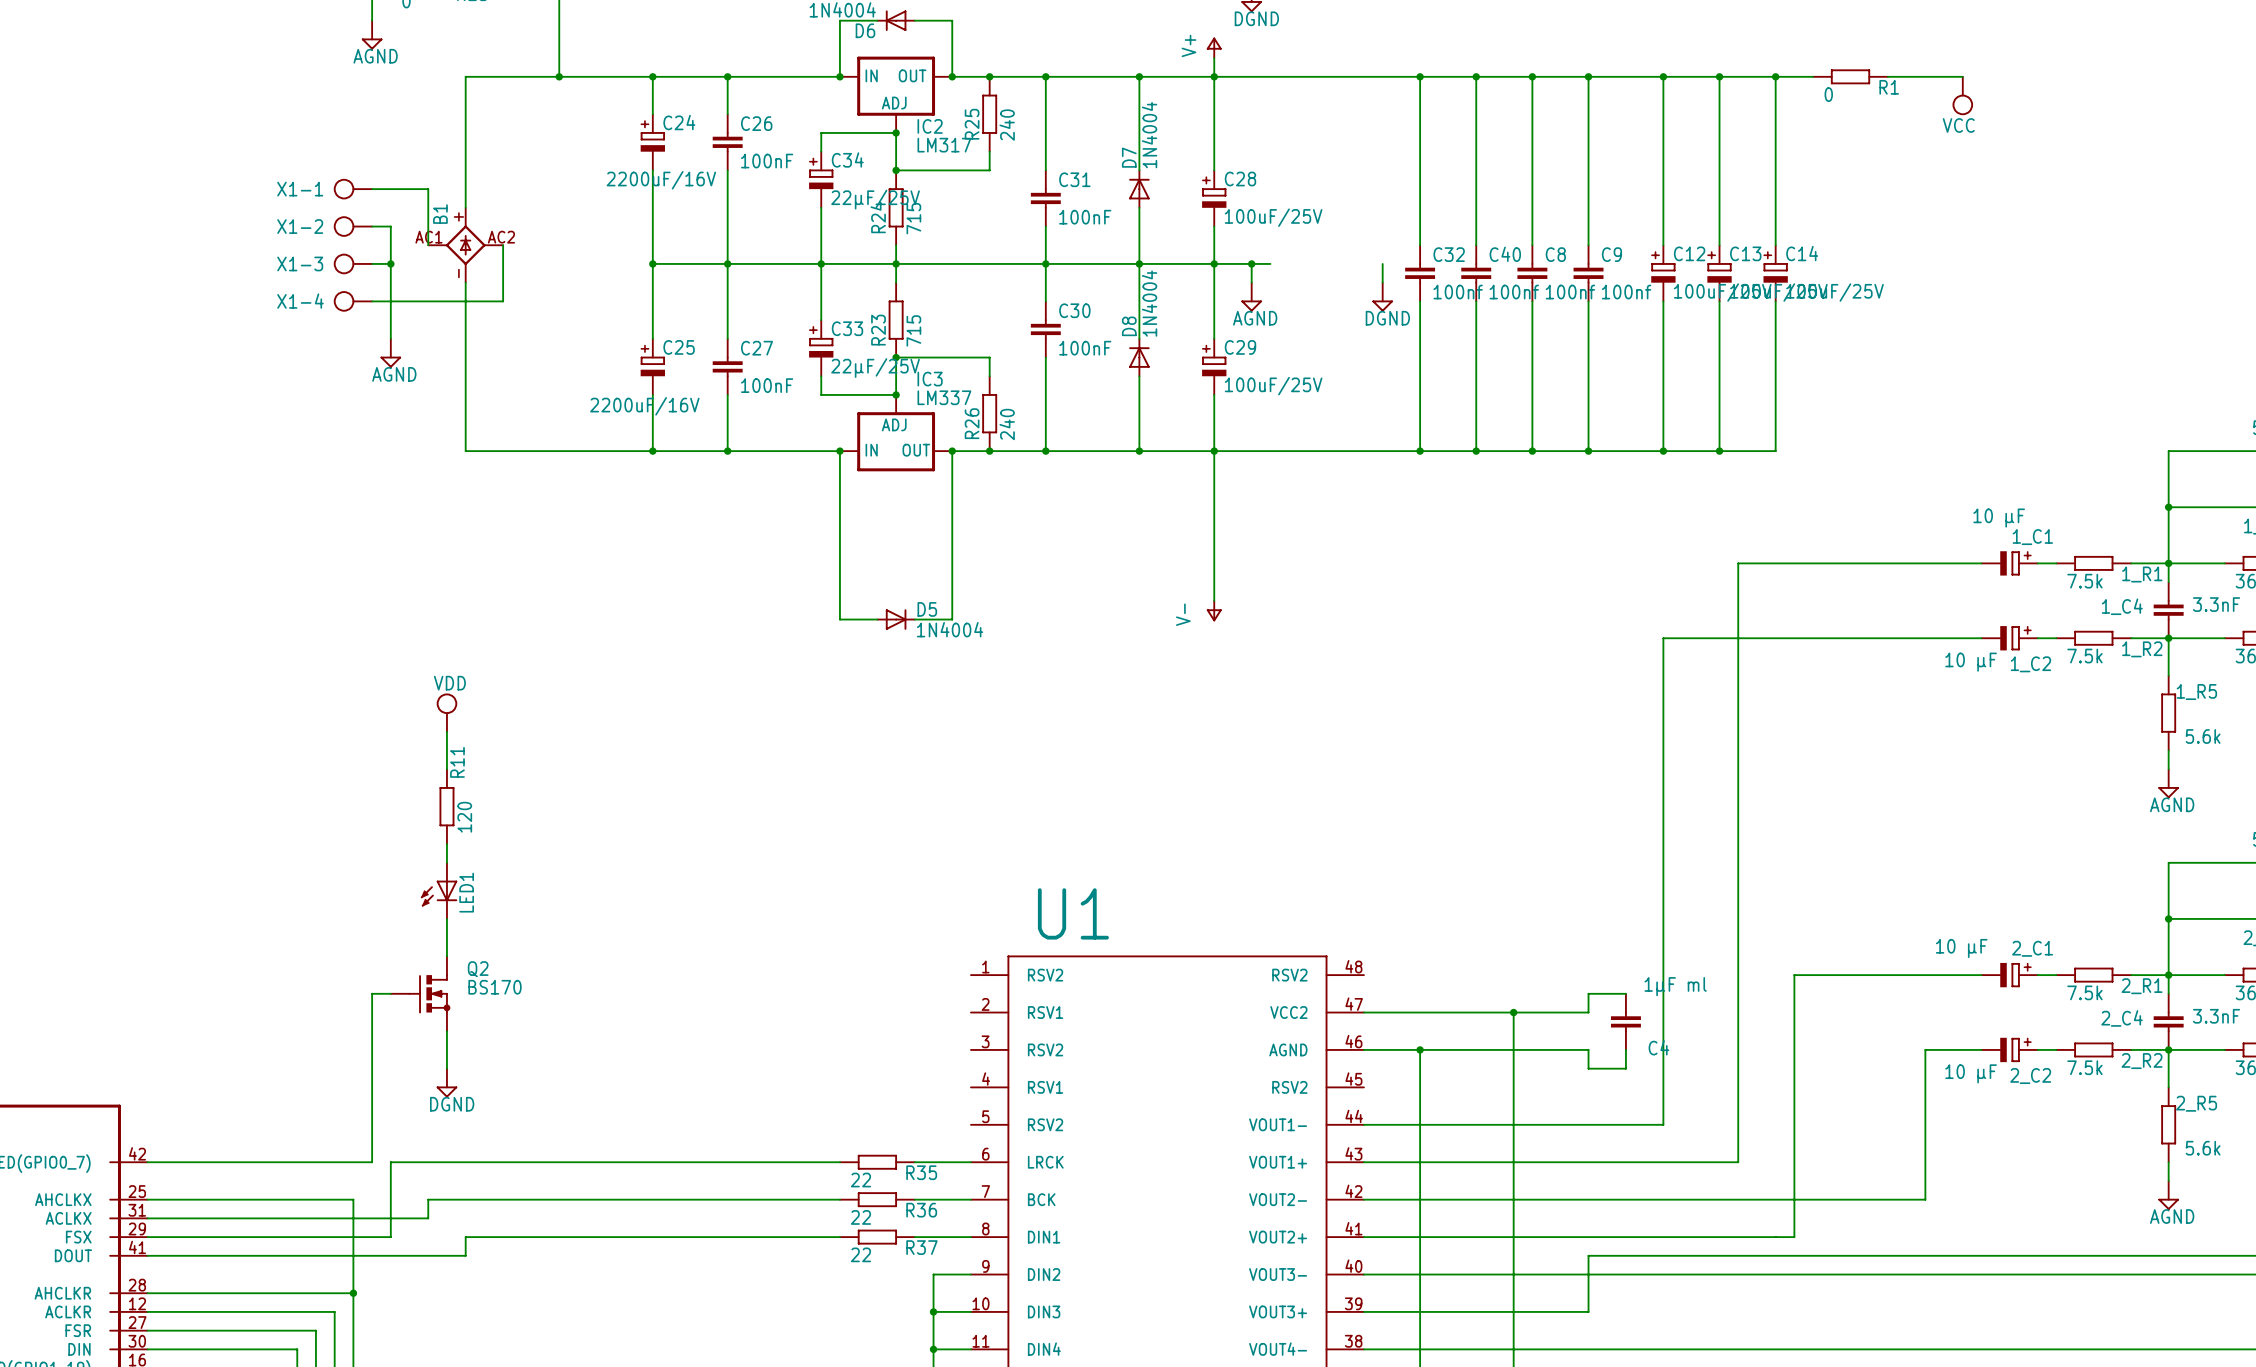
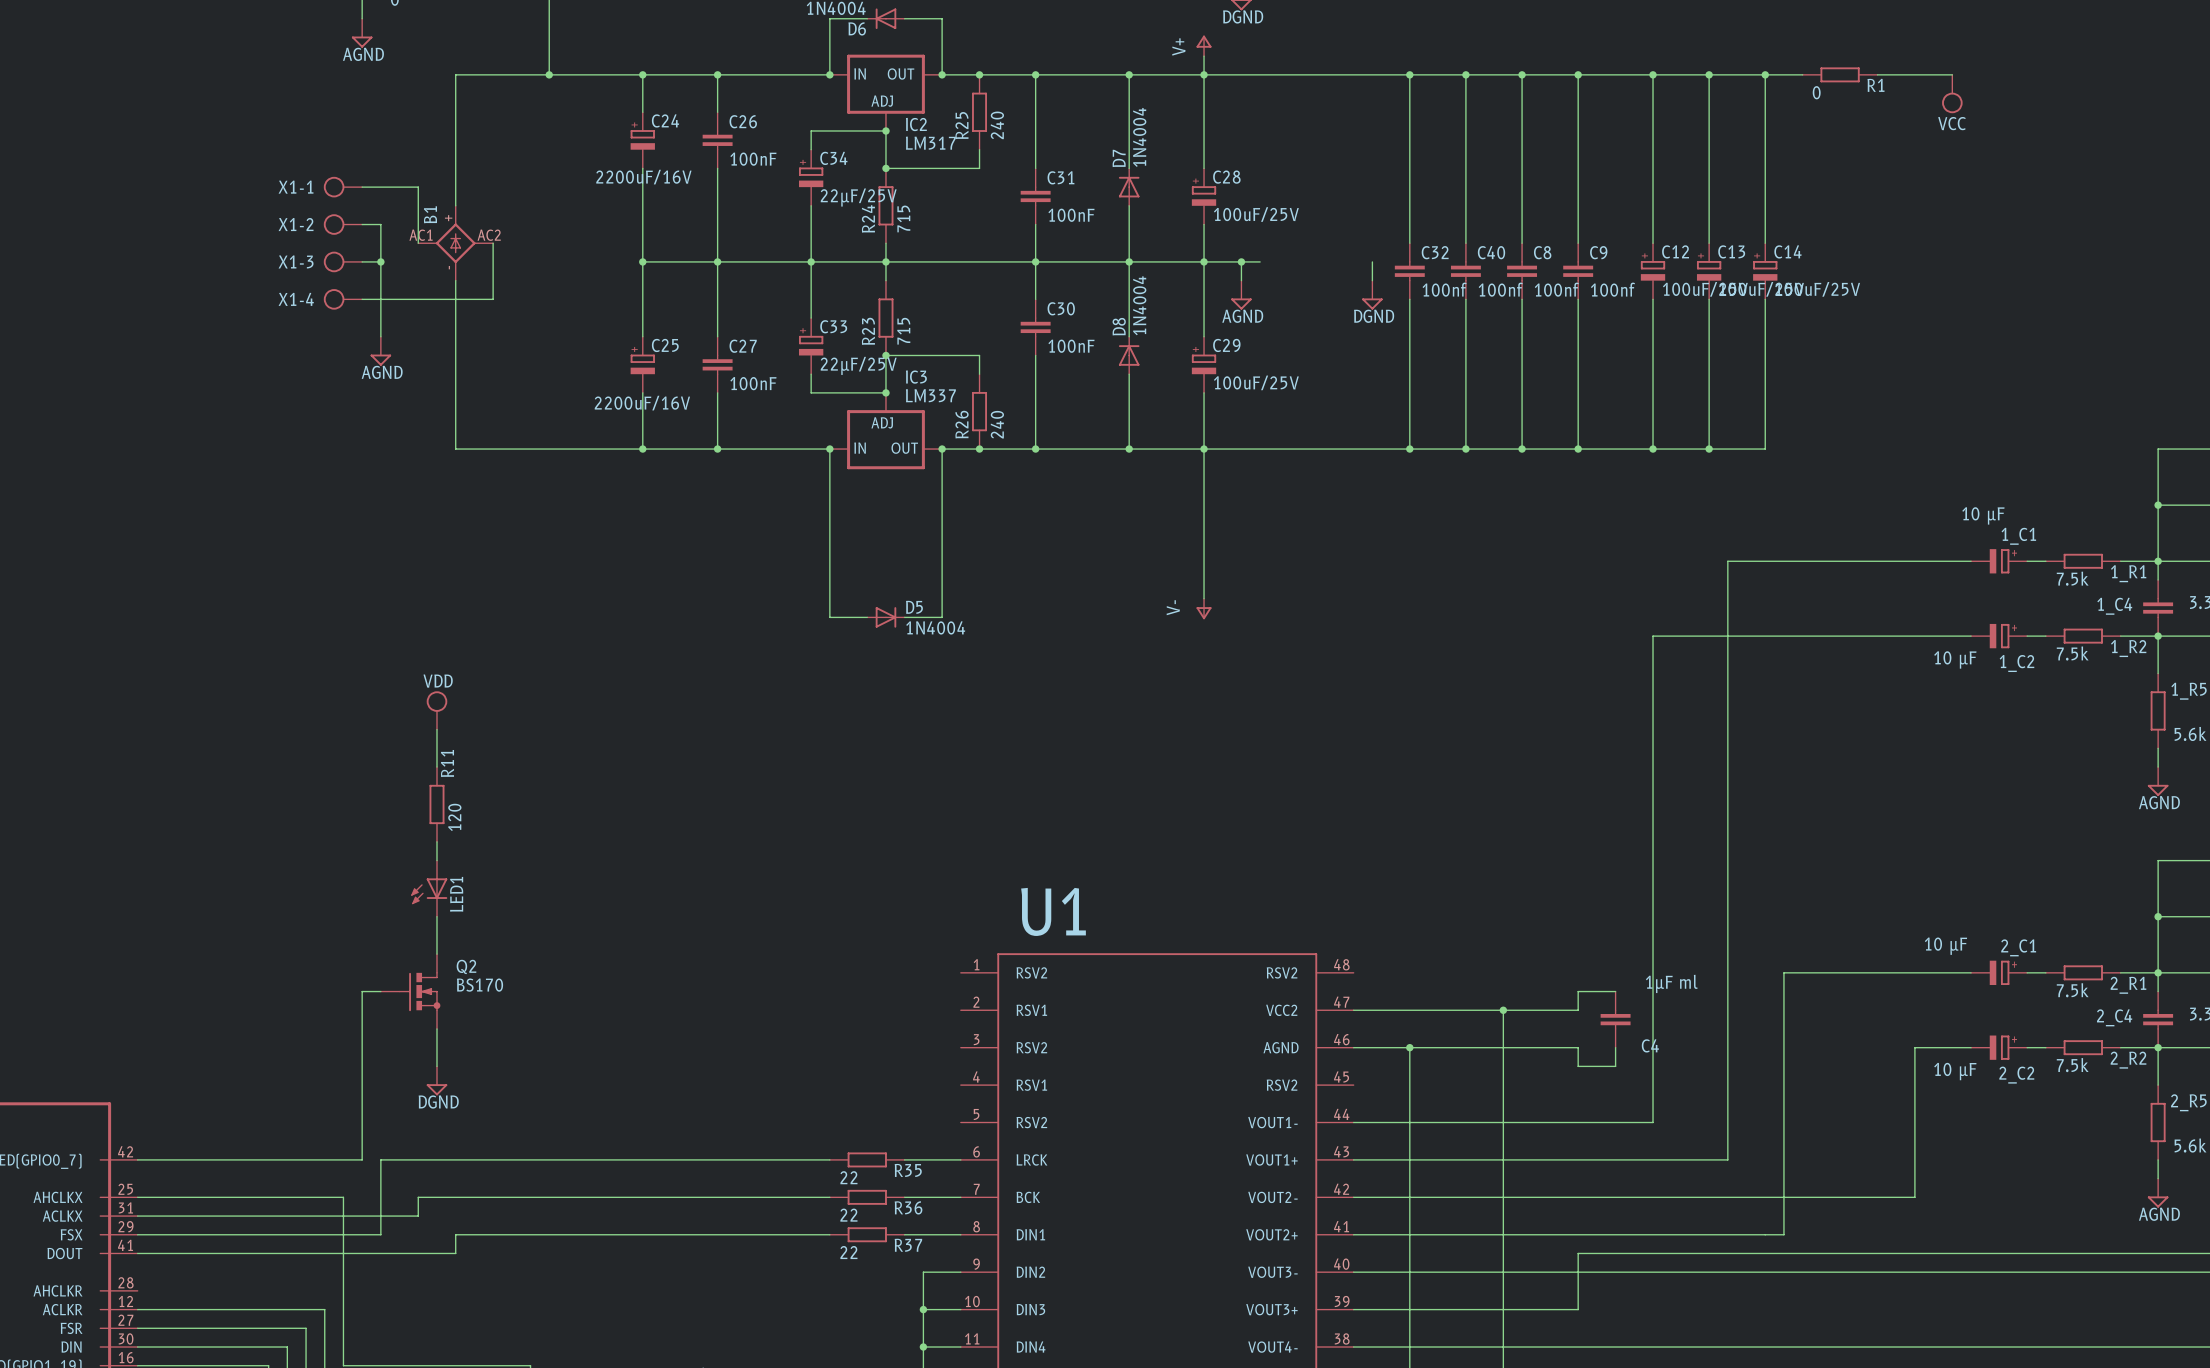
wire: (147, 1293) (353, 1293) -> none
junction: (353, 1293) -> none

